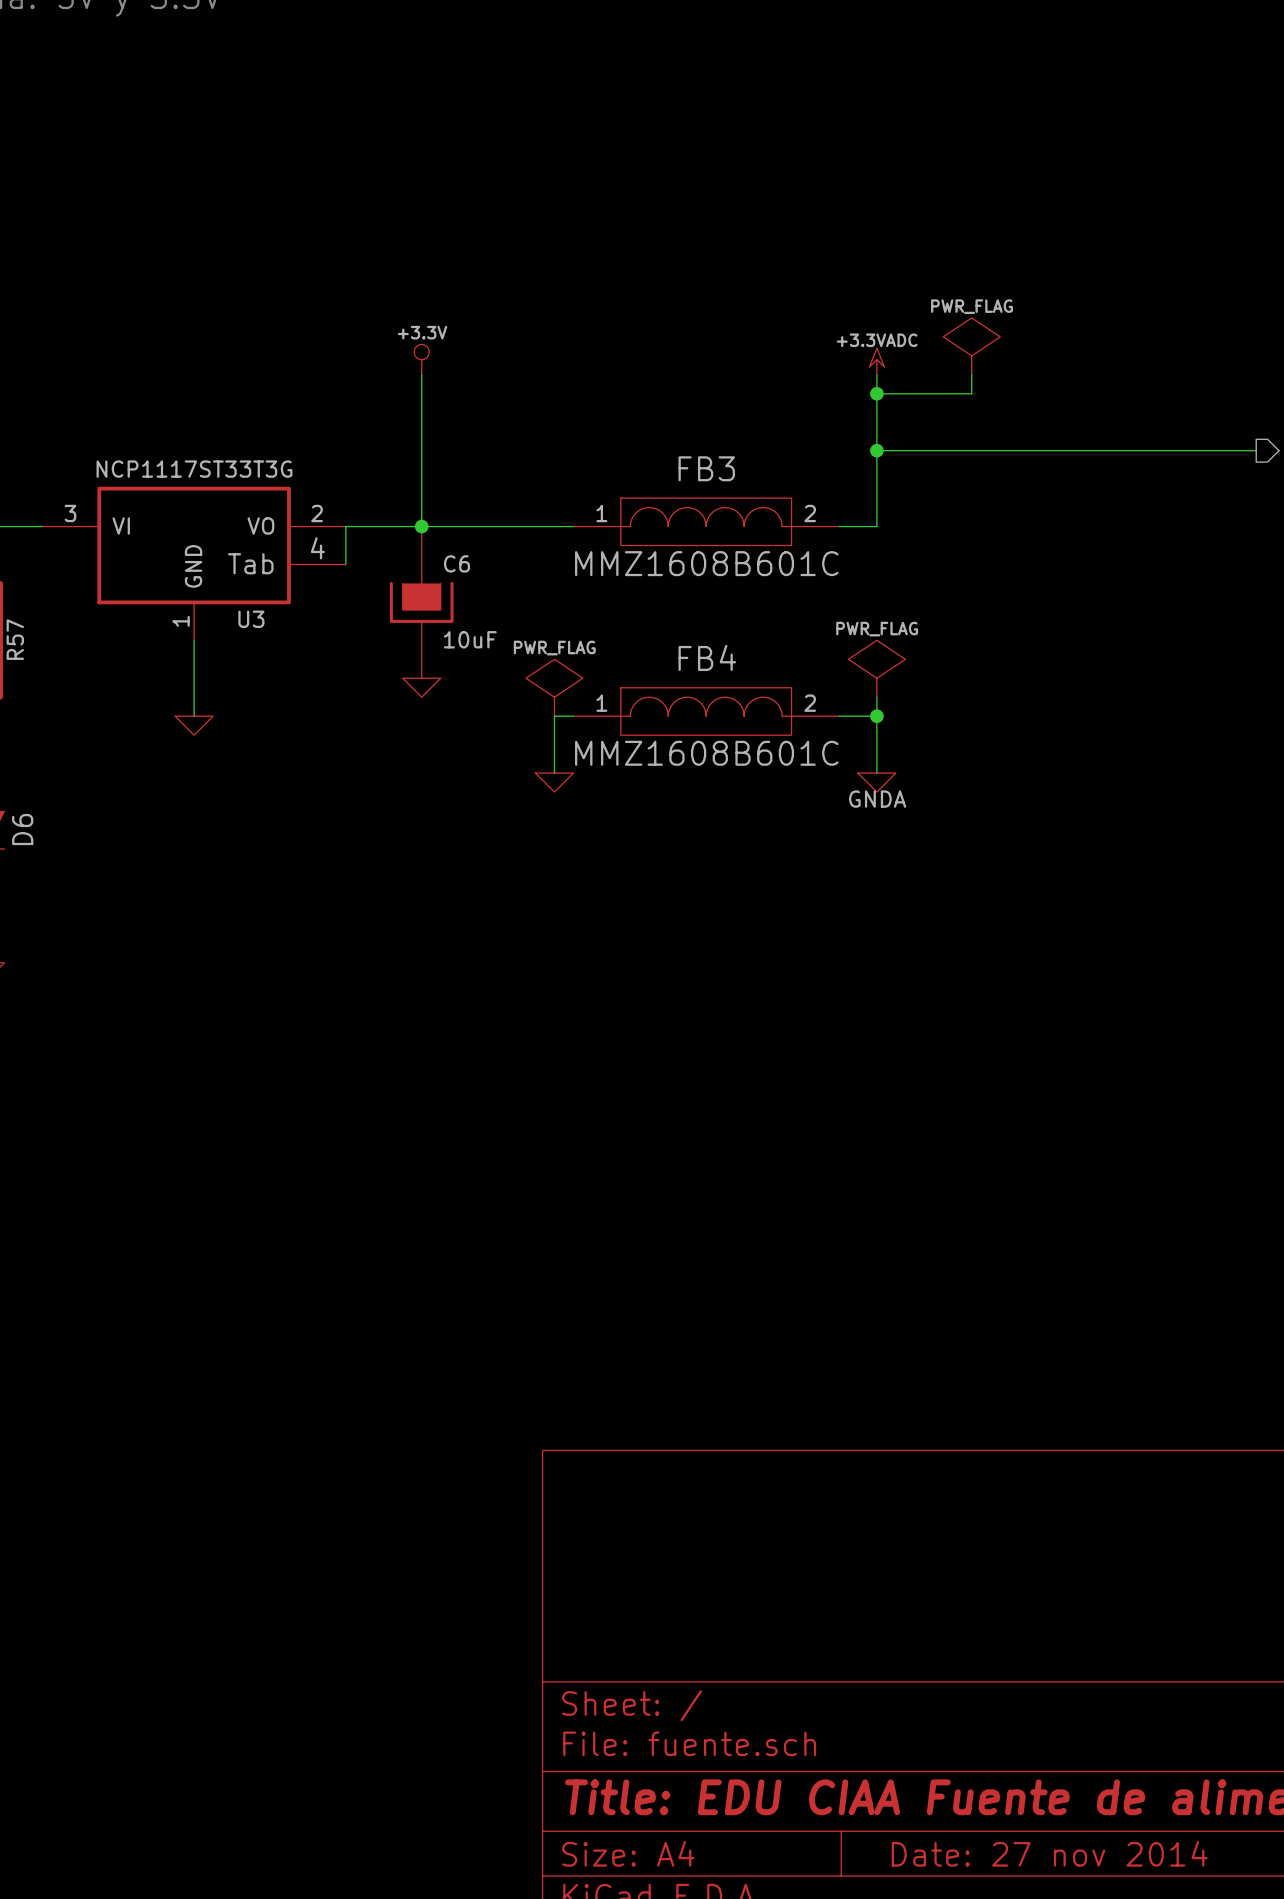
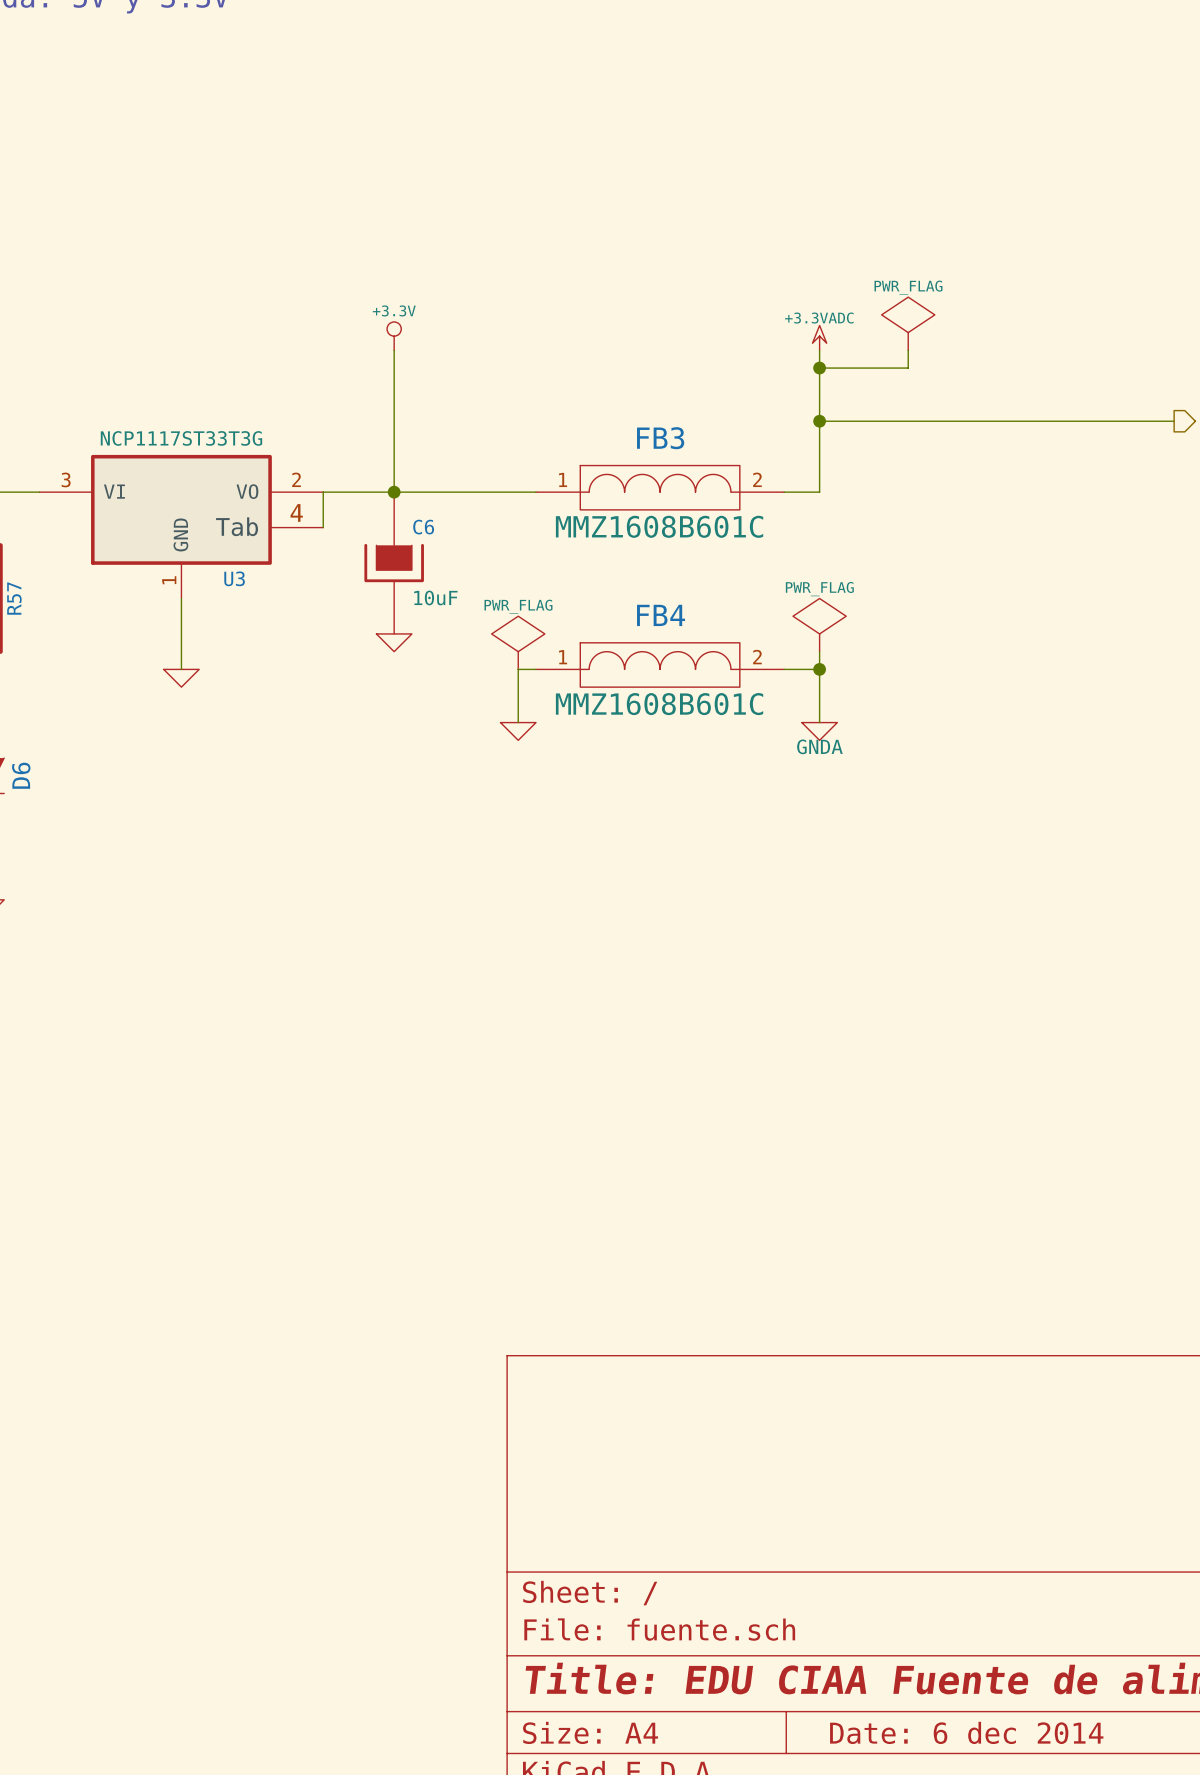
title block: Date: 27 nov 2014 (1049, 1853) -> Date: 6 dec 2014 (966, 1732)

